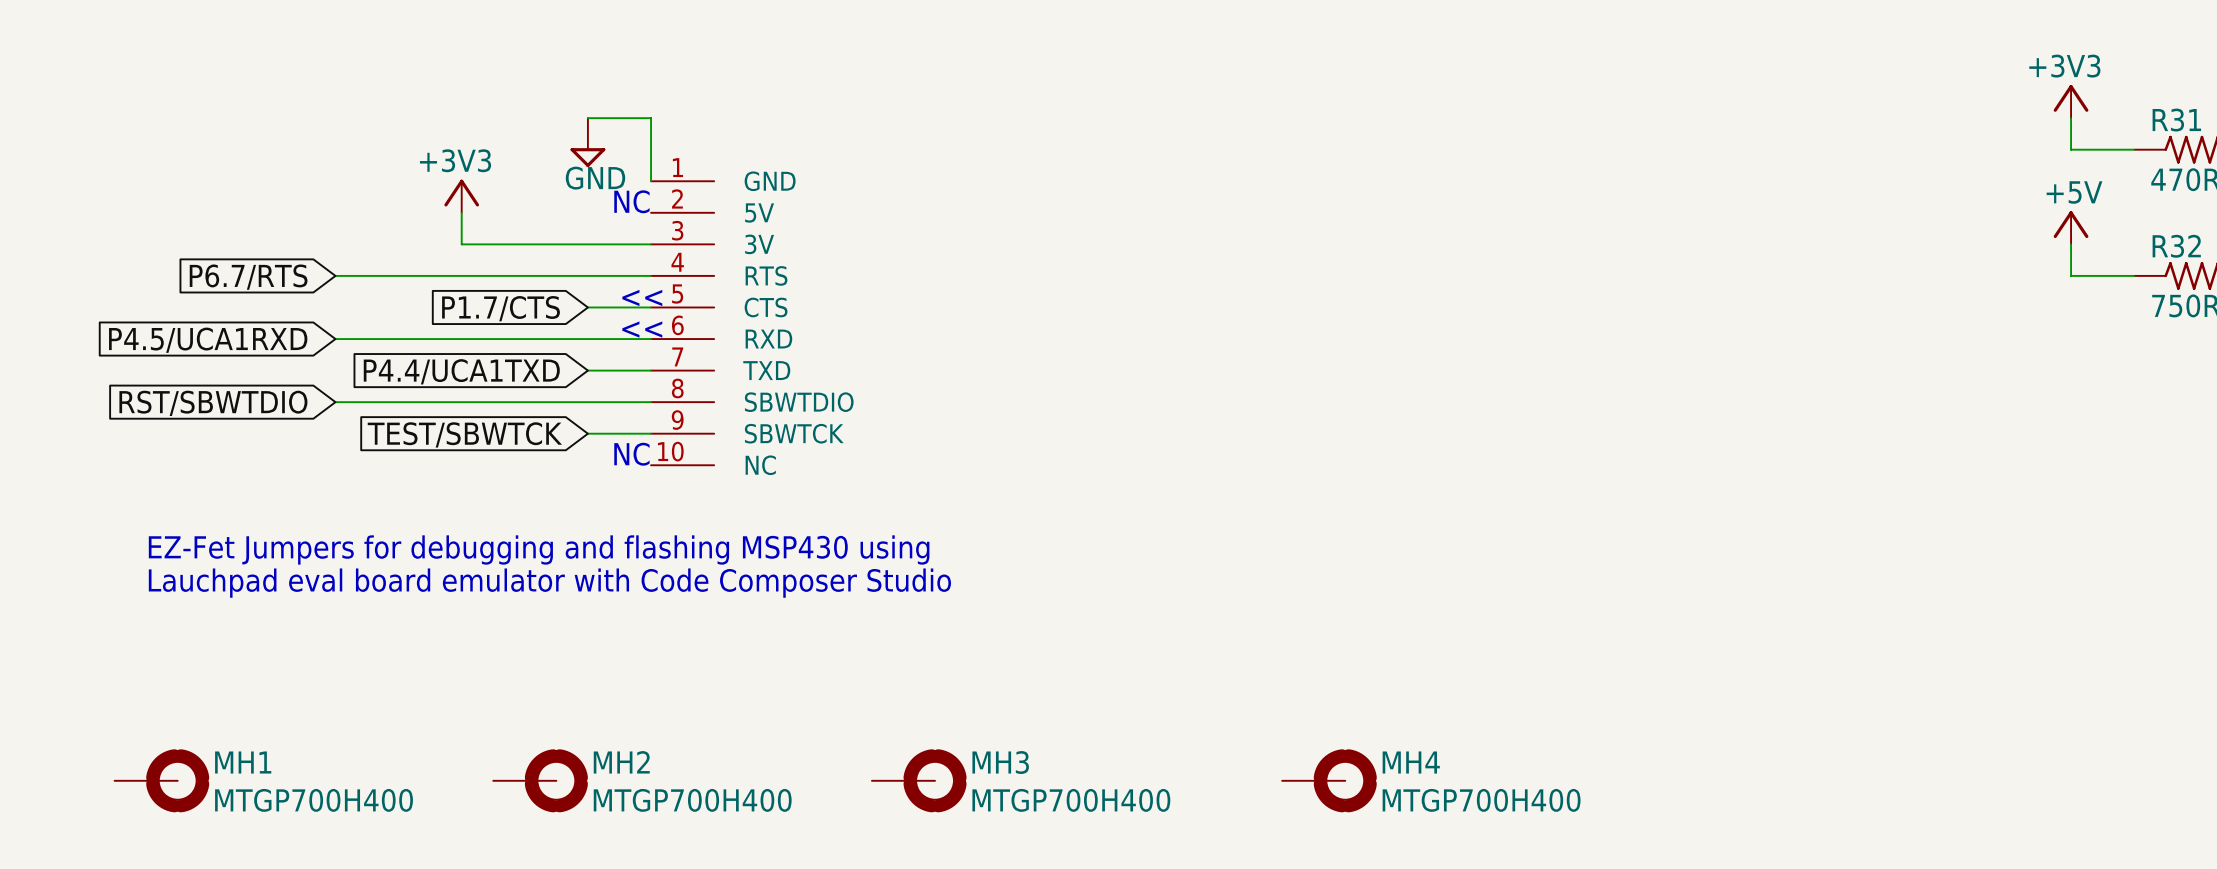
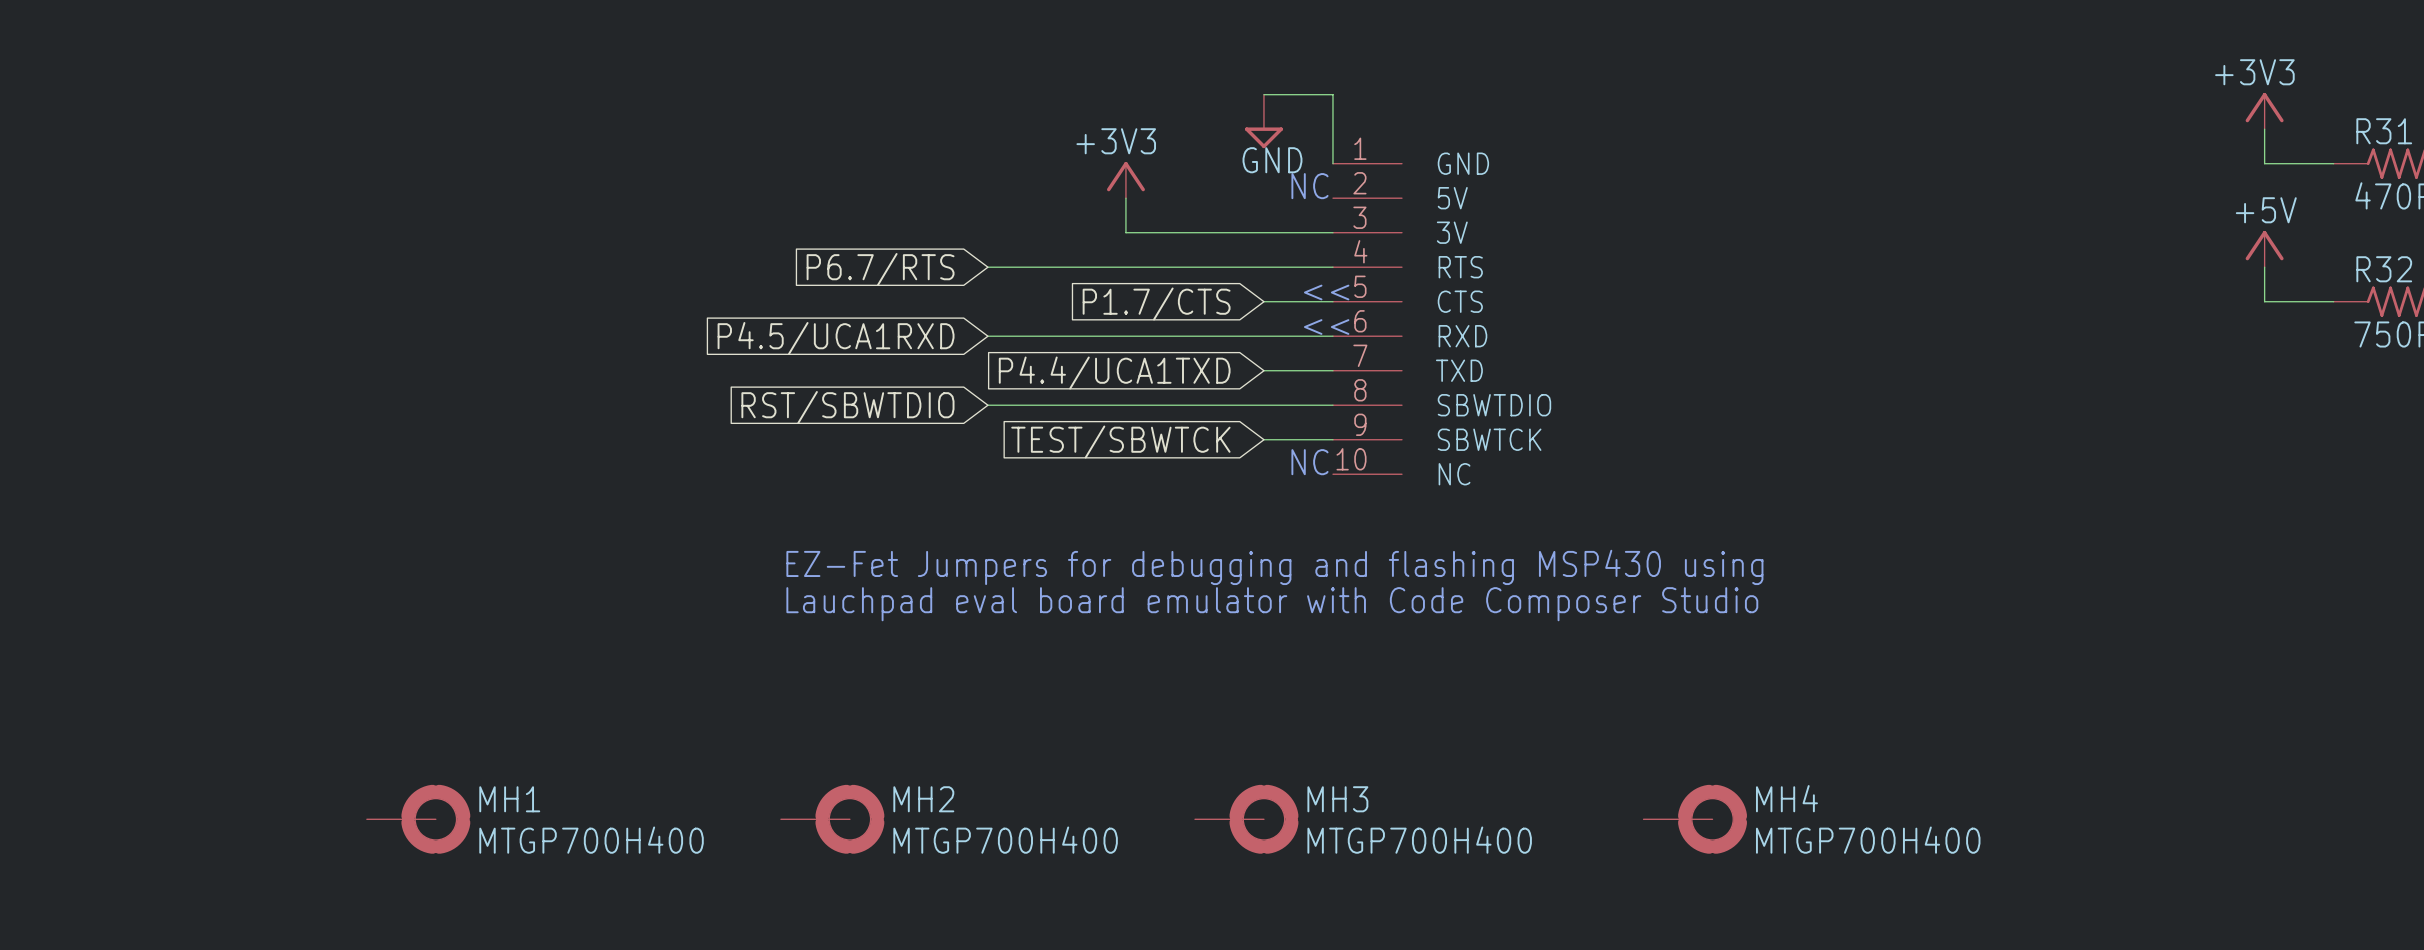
wire: none -> (1263, 94) (1332, 94) (1332, 163)
power symbol: none -> GND (1263, 121)
wire: (587, 118) (651, 118) (651, 181) -> none
power symbol: GND (587, 142) -> none
power symbol: none -> +3V3 (1125, 180)
text: none -> NC (1309, 186)
wire: none -> (1125, 198) (1125, 232) (1332, 232)
power symbol: +3V3 (461, 196) -> none
text: NC (631, 201) -> none
wire: (461, 212) (461, 244) (651, 244) -> none
wire: none -> (987, 267) (1332, 267)
global label: none -> P6.7/RTS (880, 269)
text: none -> << (1326, 292)
wire: (335, 275) (651, 275) -> none
wire: none -> (1263, 301) (1332, 301)
global label: P6.7/RTS (248, 277) -> none
global label: none -> P1.7/CTS (1156, 304)
part: none -> (1367, 318)
text: << (642, 297) -> none
text: none -> << (1326, 327)
wire: (587, 307) (651, 307) -> none
wire: none -> (987, 336) (1332, 336)
global label: P1.7/CTS (501, 308) -> none
global label: none -> P4.5/UCA1RXD (836, 338)
part: (682, 323) -> none
text: << (642, 329) -> none
wire: (335, 339) (651, 339) -> none
wire: none -> (1263, 370) (1332, 370)
global label: P4.5/UCA1RXD (208, 340) -> none
global label: none -> P4.4/UCA1TXD (1114, 373)
wire: (587, 370) (651, 370) -> none
wire: none -> (987, 405) (1332, 405)
global label: P4.4/UCA1TXD (461, 371) -> none
global label: none -> RST/SBWTDIO (847, 407)
wire: (335, 402) (651, 402) -> none
wire: none -> (1263, 439) (1332, 439)
global label: RST/SBWTDIO (213, 403) -> none
global label: none -> TEST/SBWTCK (1120, 442)
text: none -> NC (1309, 462)
wire: (587, 433) (651, 433) -> none
global label: TEST/SBWTCK (464, 434) -> none
text: NC (631, 454) -> none
text: none -> EZ-Fet Jumpers for debugging and flashing MSP430 using (1274, 567)
text: EZ-Fet Jumpers for debugging and flashing MSP430 using (539, 549) -> none
text: none -> Lauchpad eval board emulator with Code Composer Studio (1272, 604)
text: Lauchpad eval board emulator with Code Composer Studio (549, 583) -> none
MH1 position: (161, 780) -> (418, 819)
MH2 position: (540, 780) -> (832, 819)
MH3 position: (919, 780) -> (1246, 819)
MH4 position: (1329, 780) -> (1695, 819)

